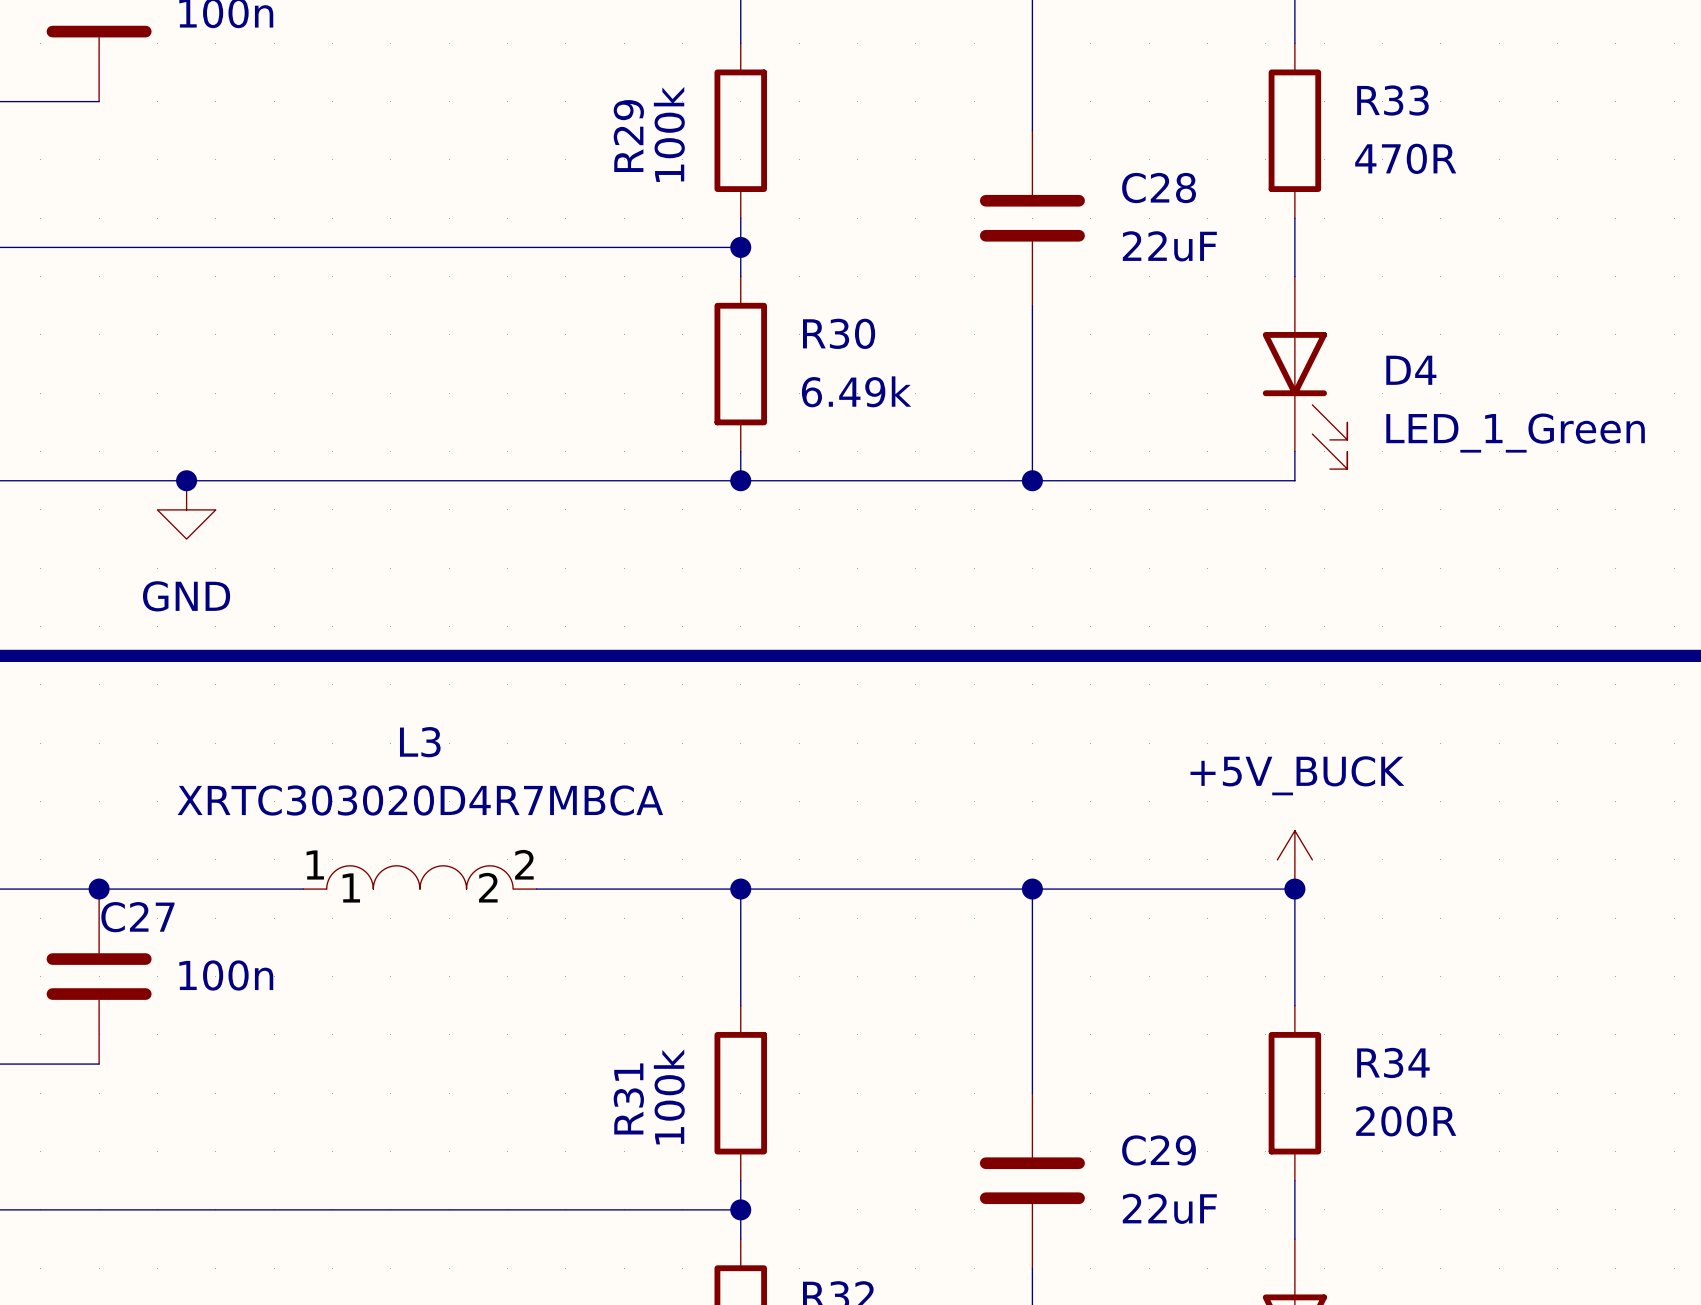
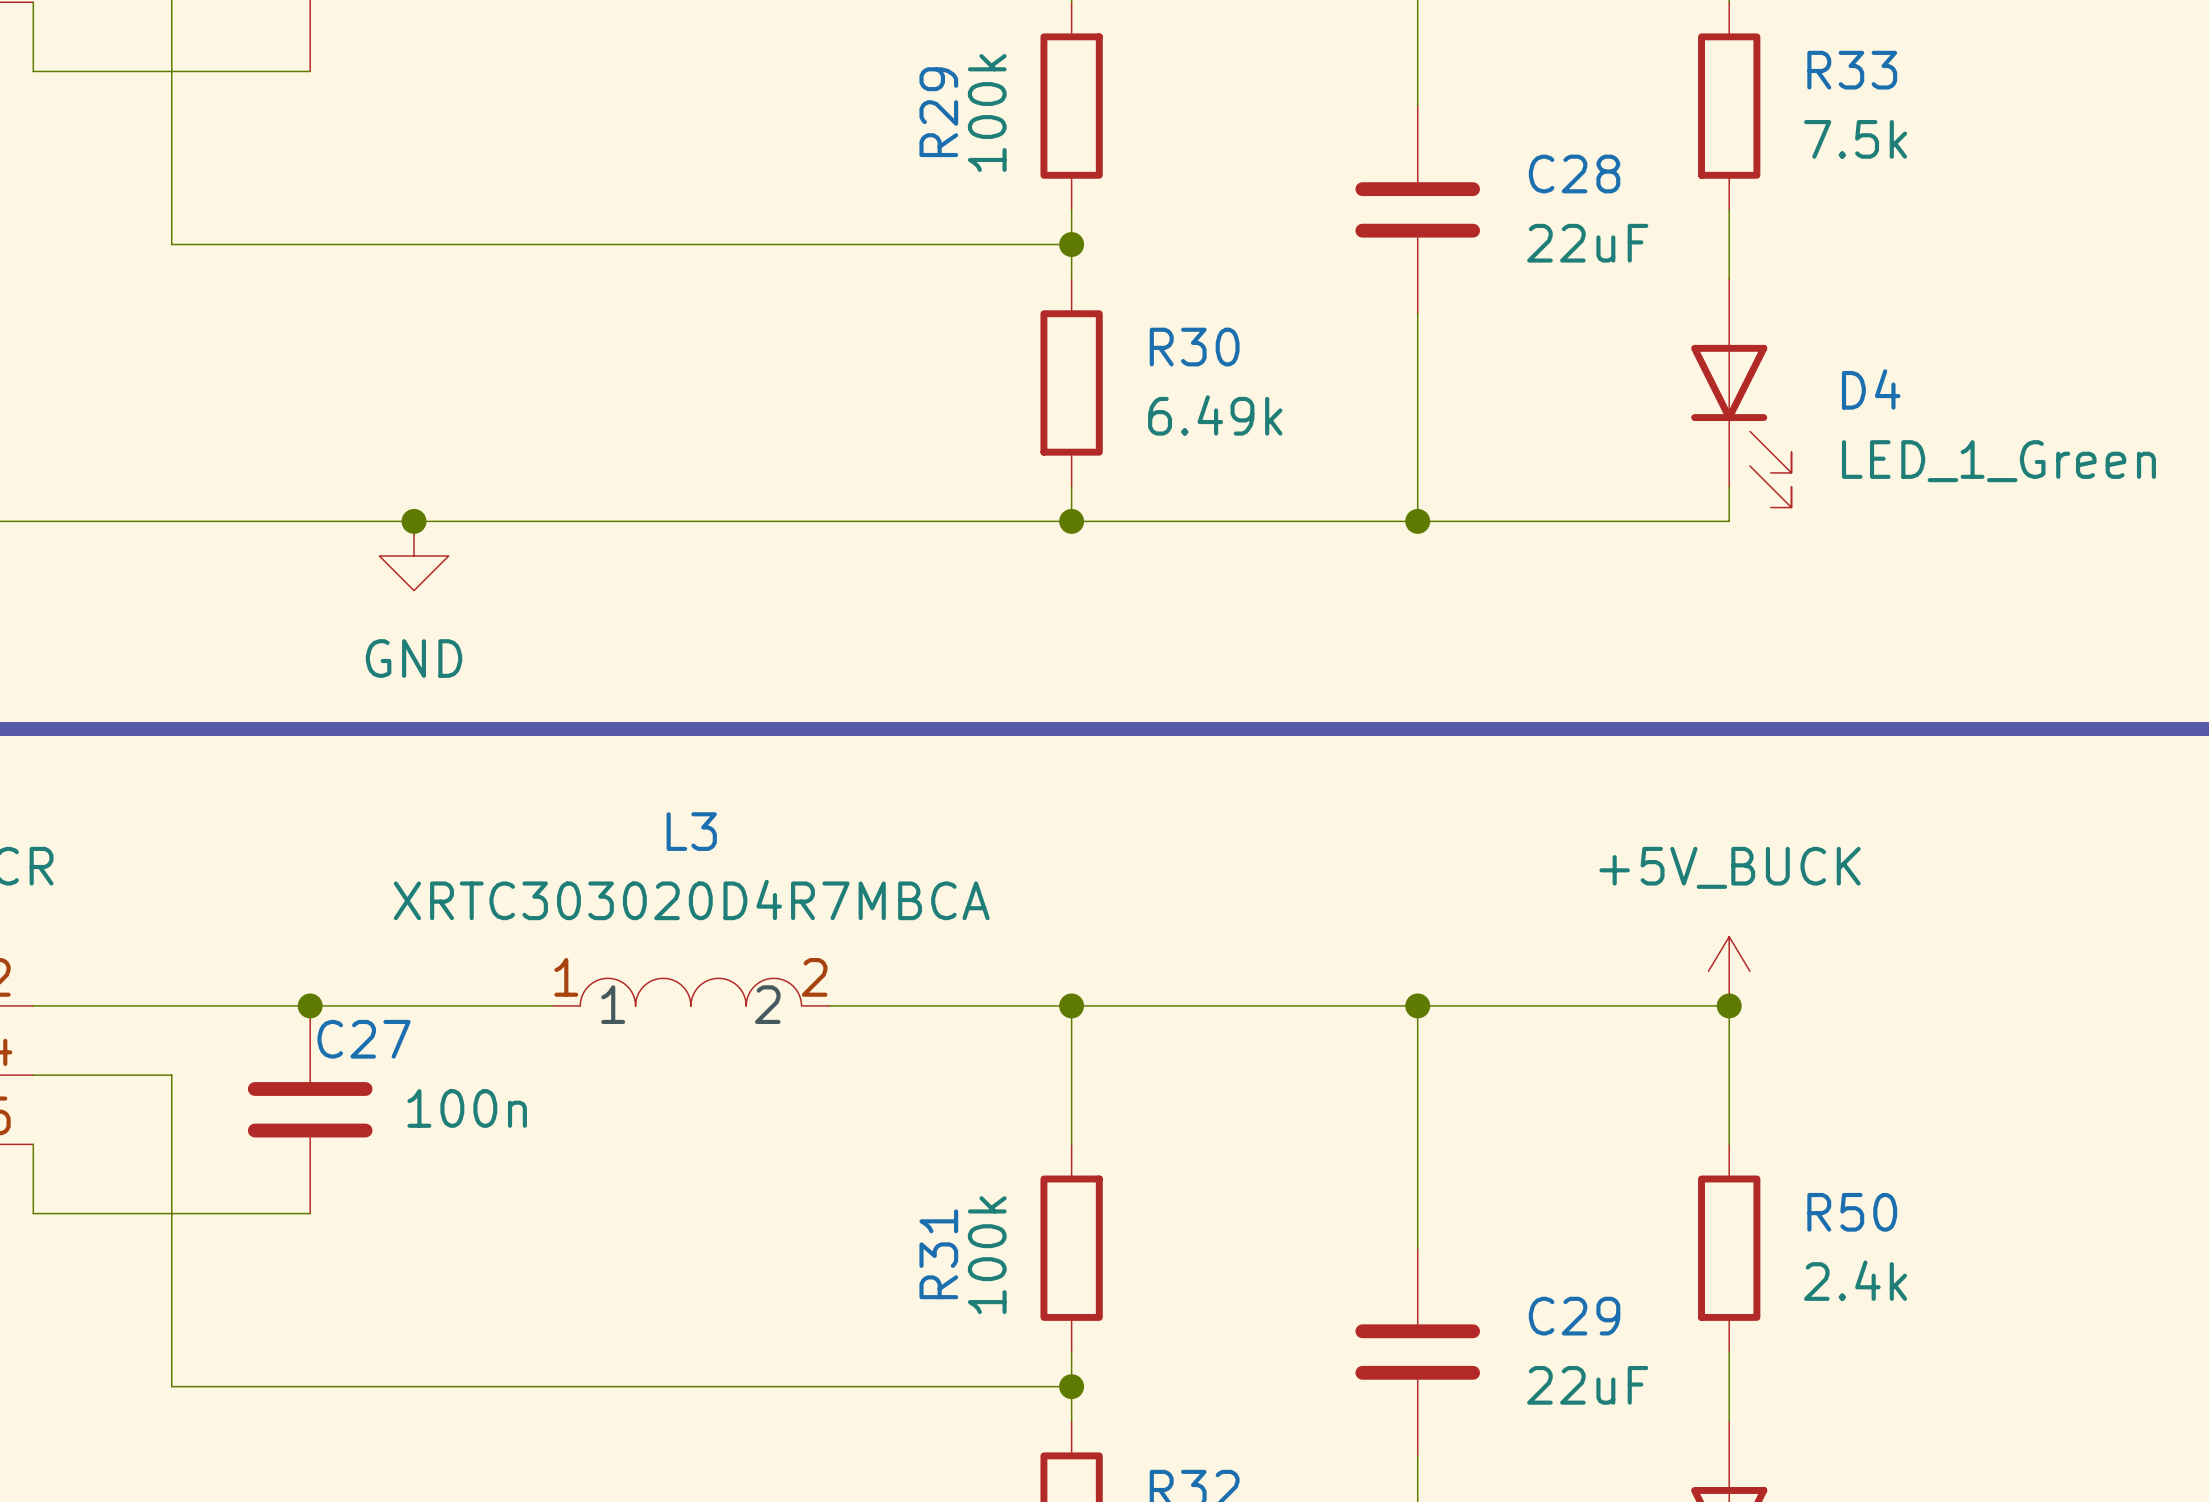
R33 value: 470R (1405, 158) -> 7.5k (1855, 139)
R34 name: R34 (1393, 1062) -> R50 (1852, 1212)
R34 value: 200R (1406, 1121) -> 2.4k (1855, 1280)

